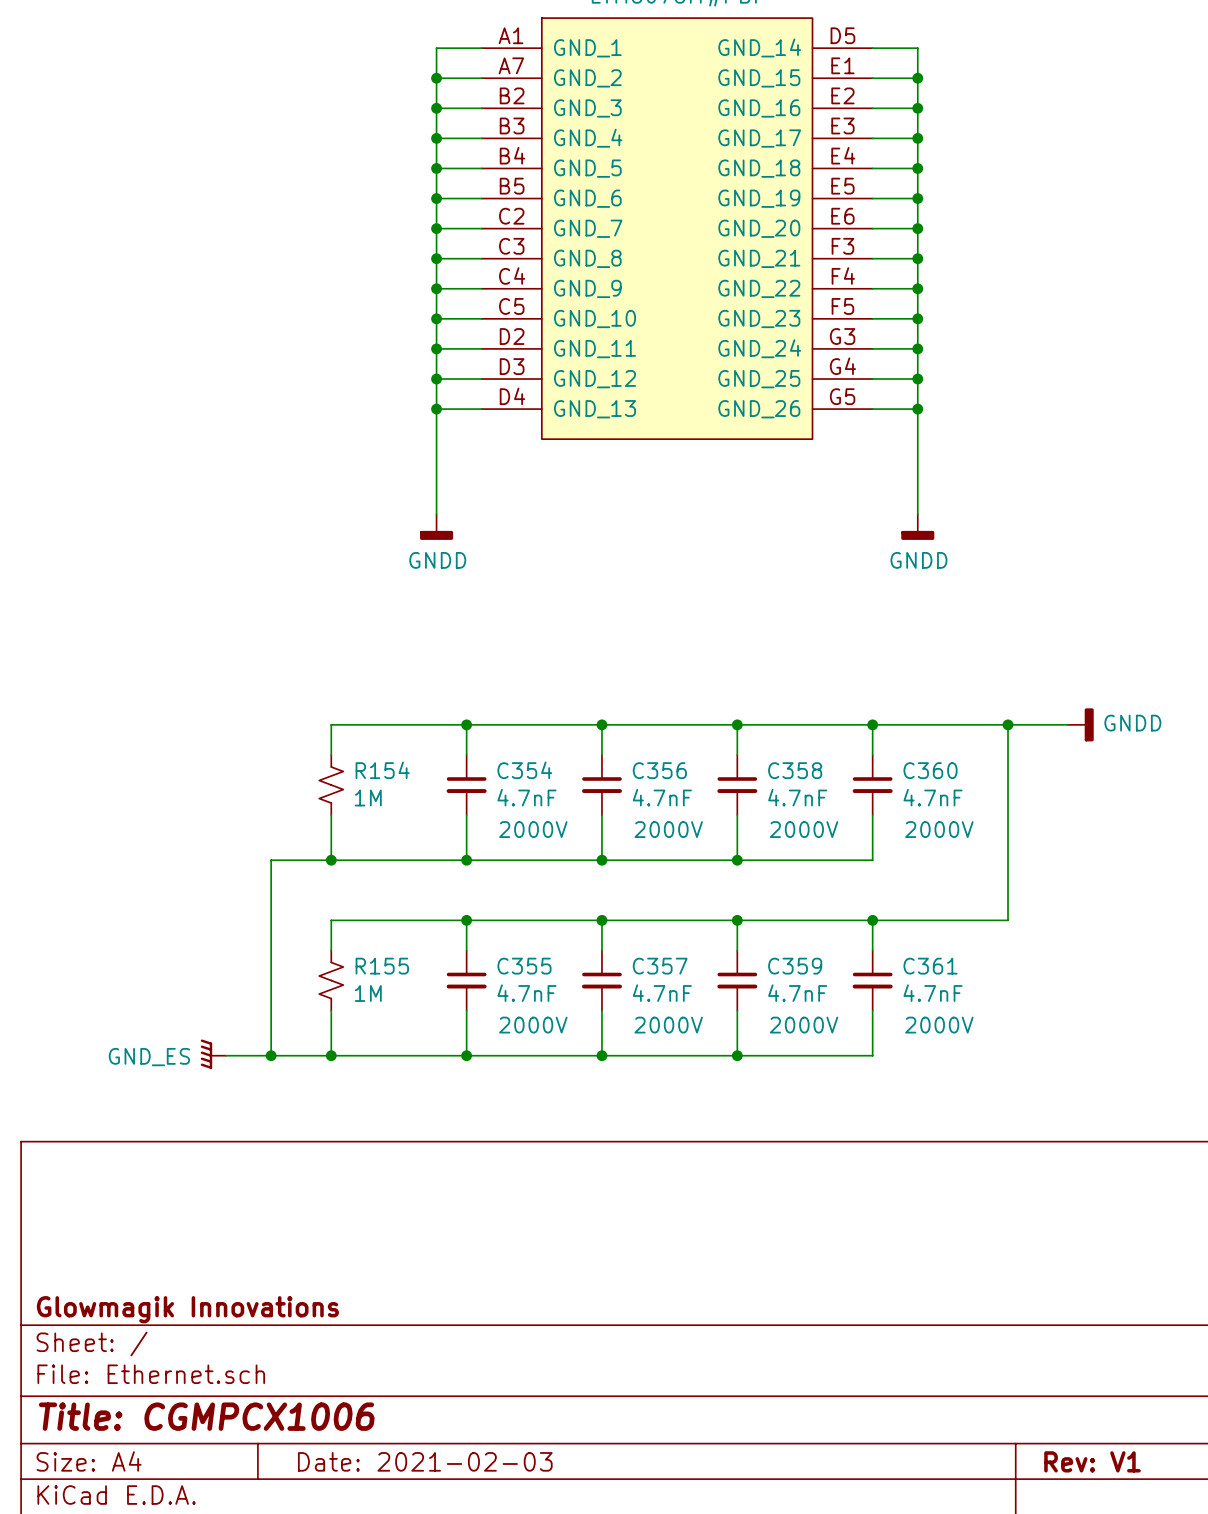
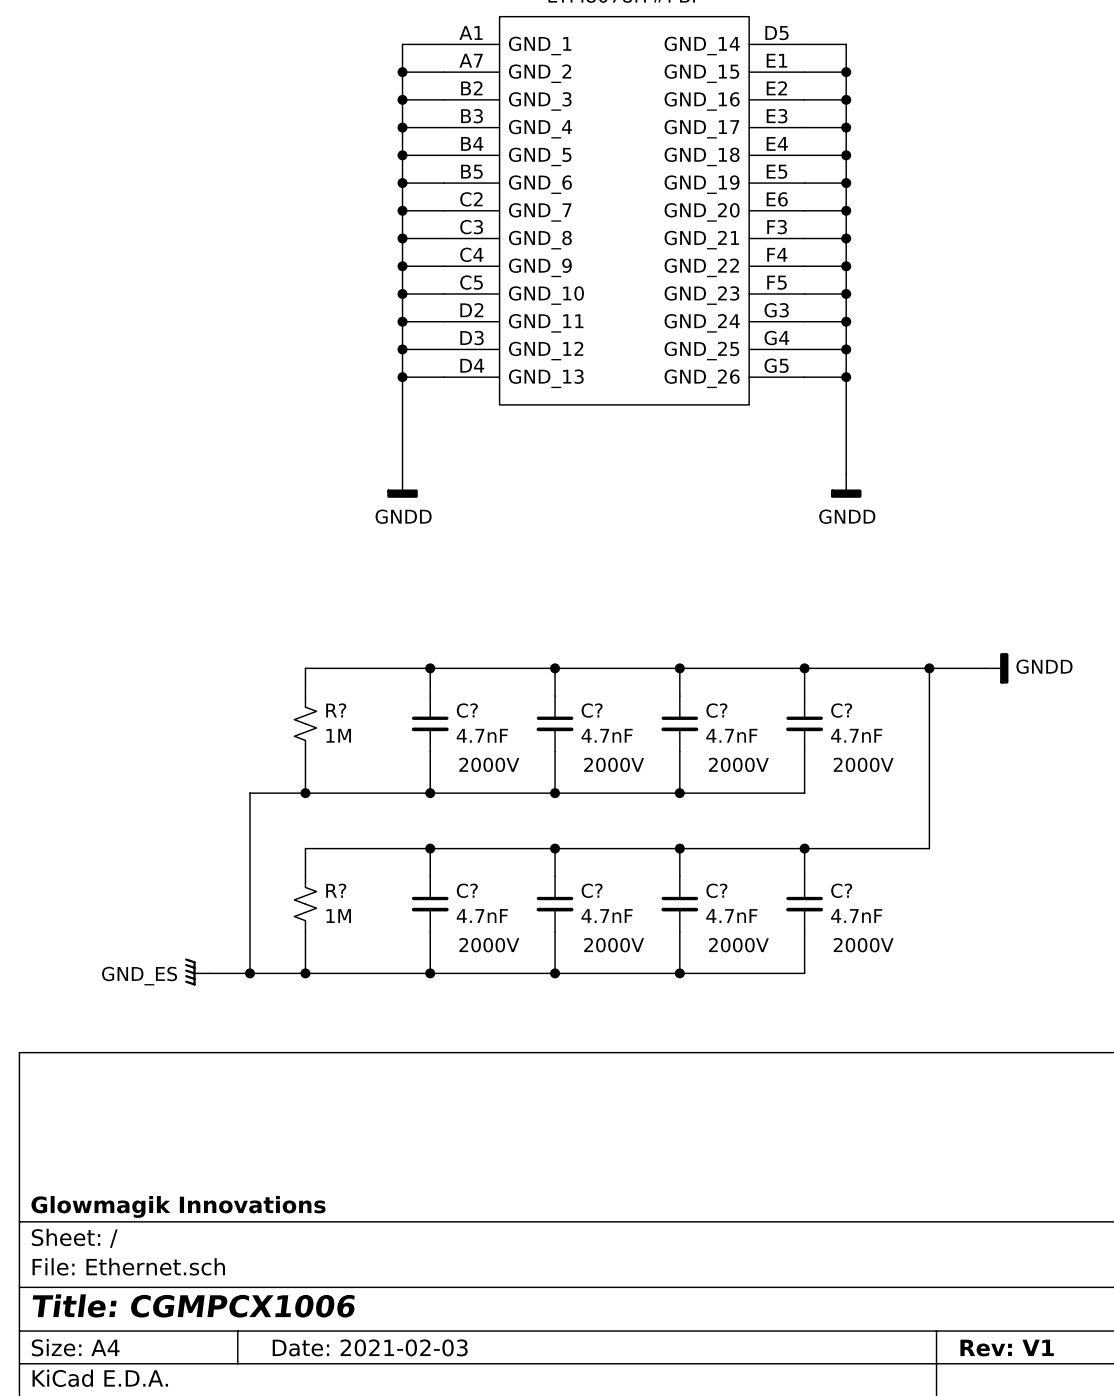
R154 name: R154 (382, 770) -> R? (336, 710)
C354 name: C354 (524, 770) -> C? (467, 710)
C356 name: C356 (659, 770) -> C? (592, 710)
C358 name: C358 (795, 770) -> C? (716, 710)
C360 name: C360 (930, 770) -> C? (841, 710)
R155 name: R155 (382, 966) -> R? (336, 890)
C355 name: C355 (524, 966) -> C? (467, 890)
C357 name: C357 (660, 966) -> C? (592, 890)
C359 name: C359 (795, 966) -> C? (716, 890)
C361 name: C361 (930, 966) -> C? (841, 890)

